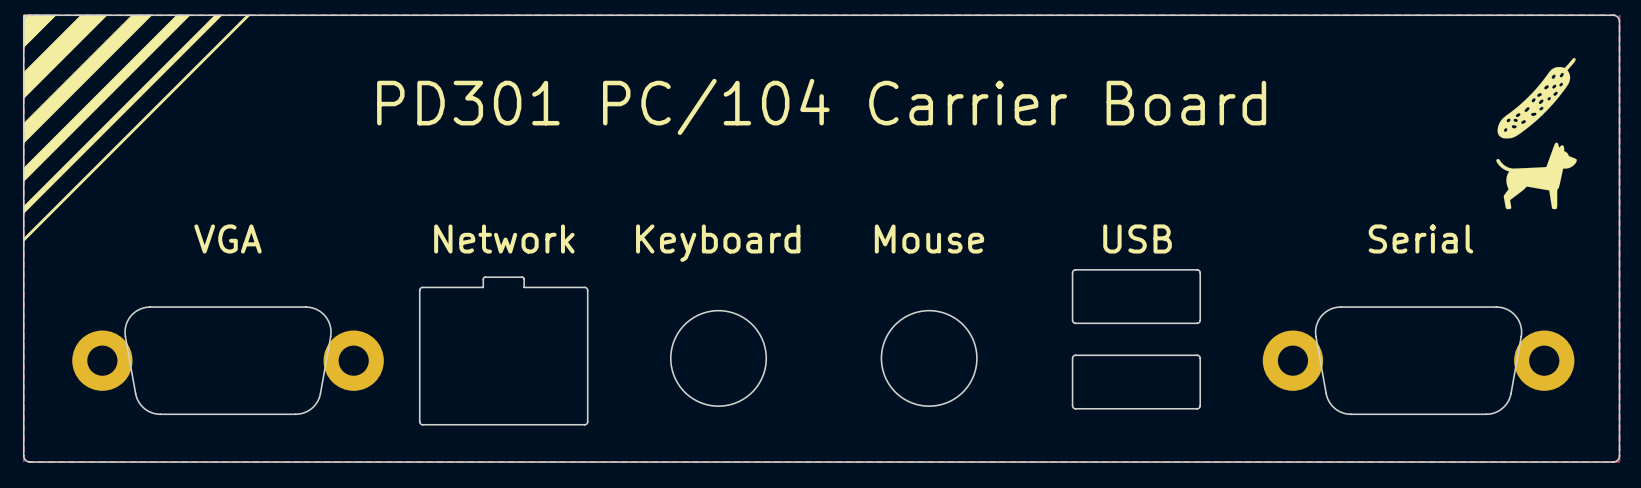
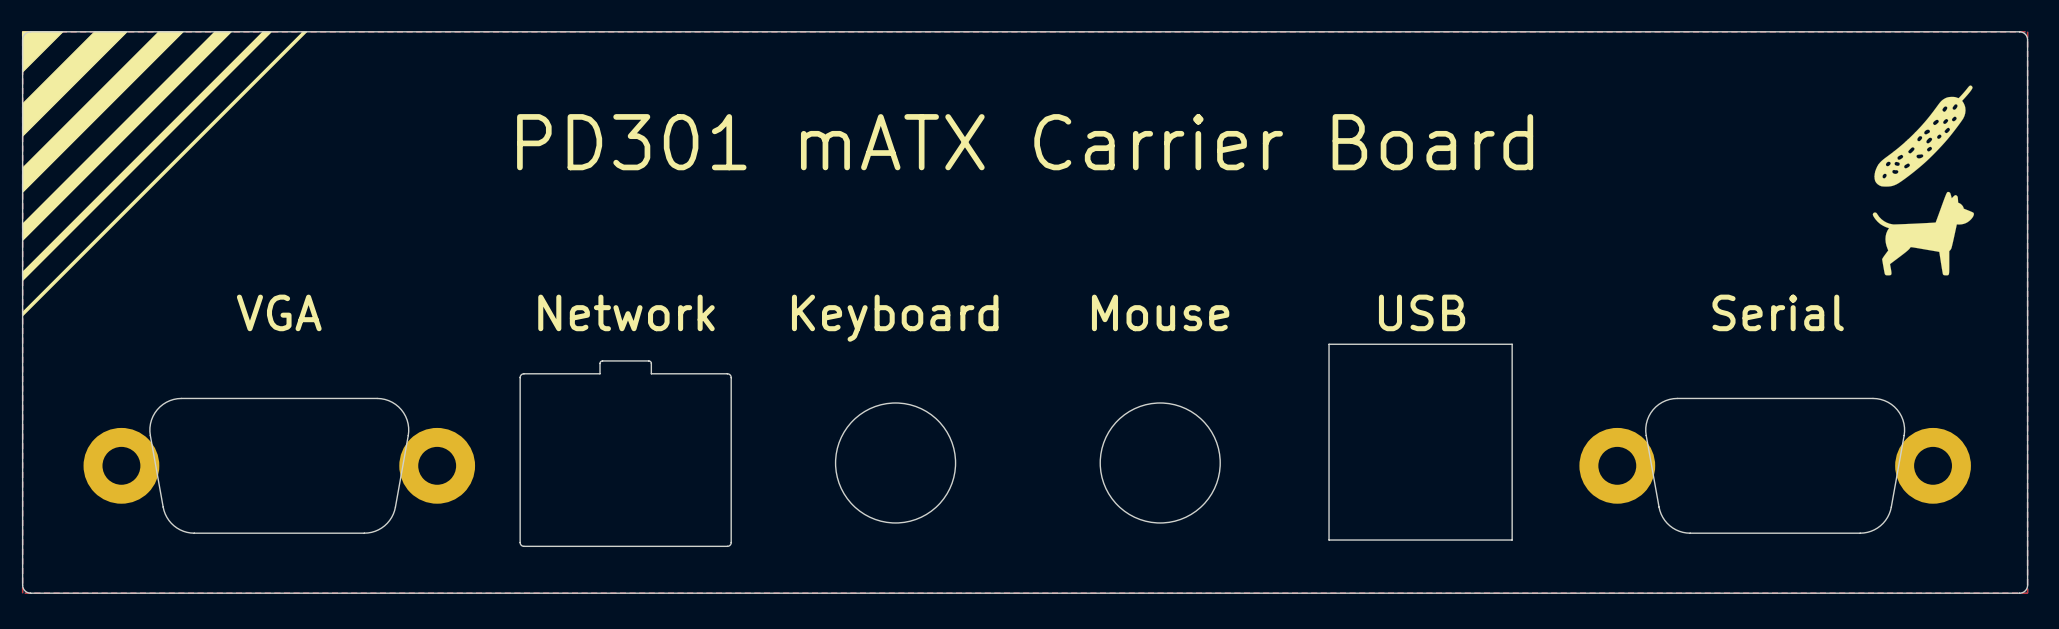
text: PD301 PC/104 Carrier Board (821, 106) -> PD301 mATX Carrier Board (1025, 142)
board edge: none -> (1329, 344) (1329, 540) (1512, 540) (1512, 344) (1329, 344)
board edge: (1075, 269) (1198, 270) (1200, 272) (1199, 321) (1197, 323) (1074, 323) (1072, 320) (1072, 272) (1075, 269) -> none
board edge: (1075, 355) (1198, 355) (1200, 358) (1199, 406) (1197, 408) (1074, 408) (1072, 405) (1072, 358) (1075, 355) -> none

